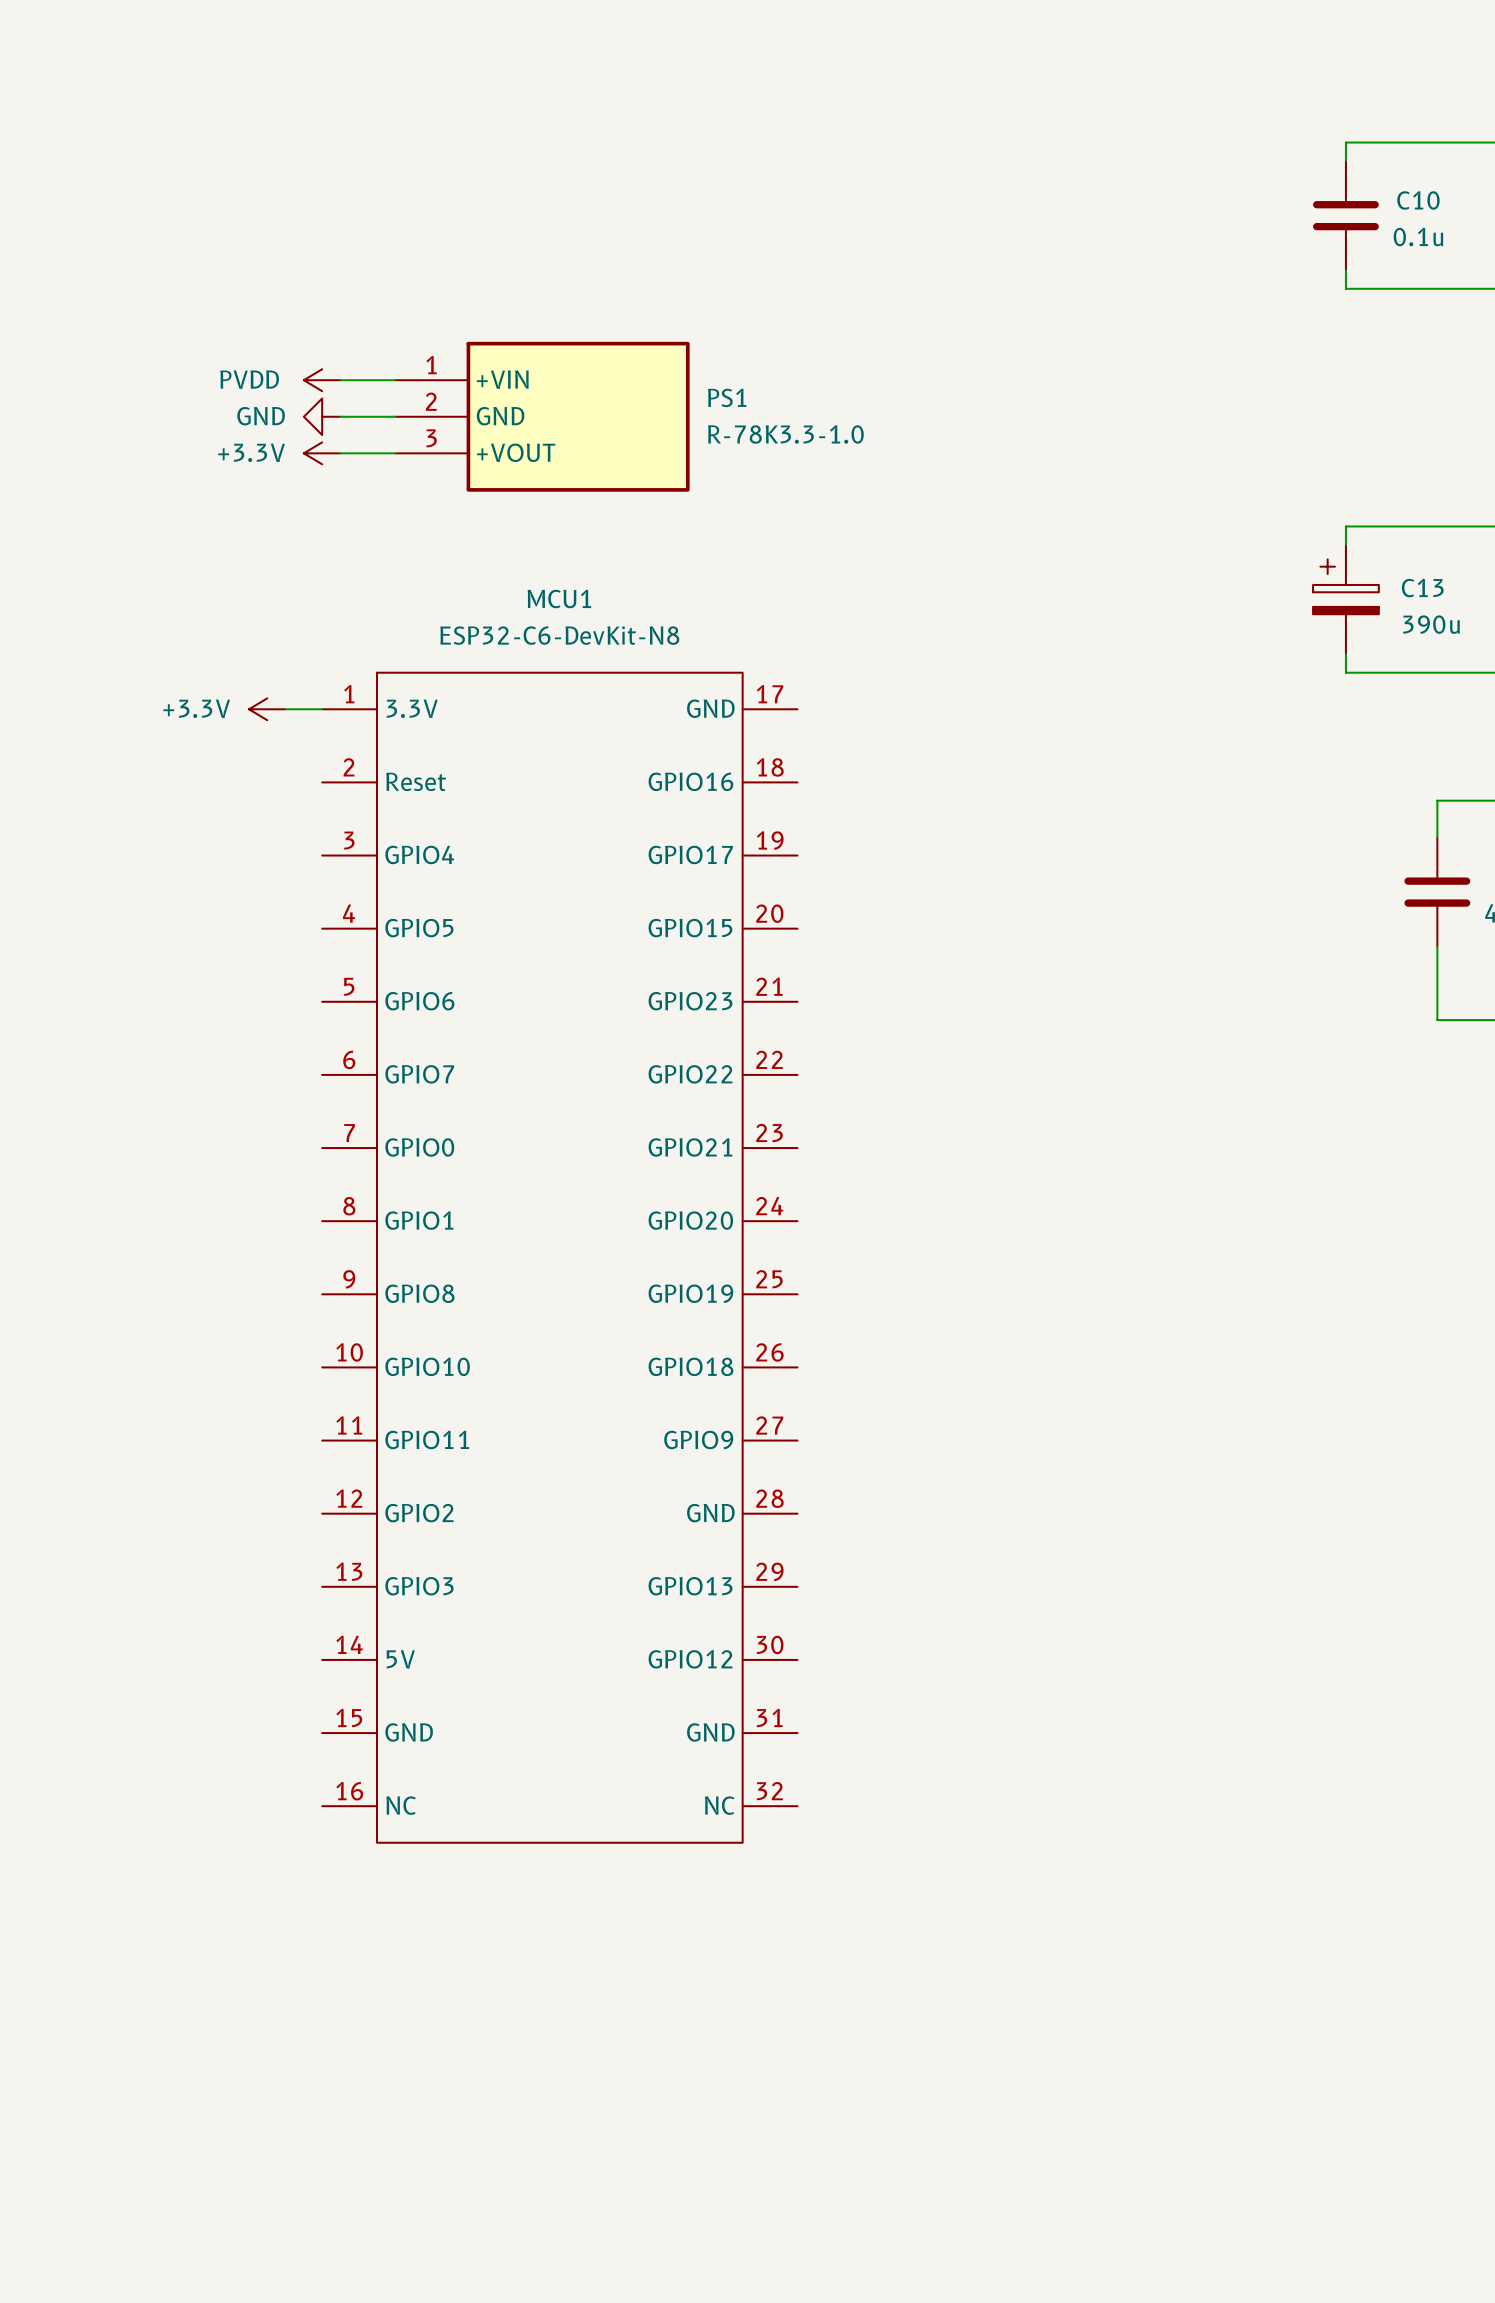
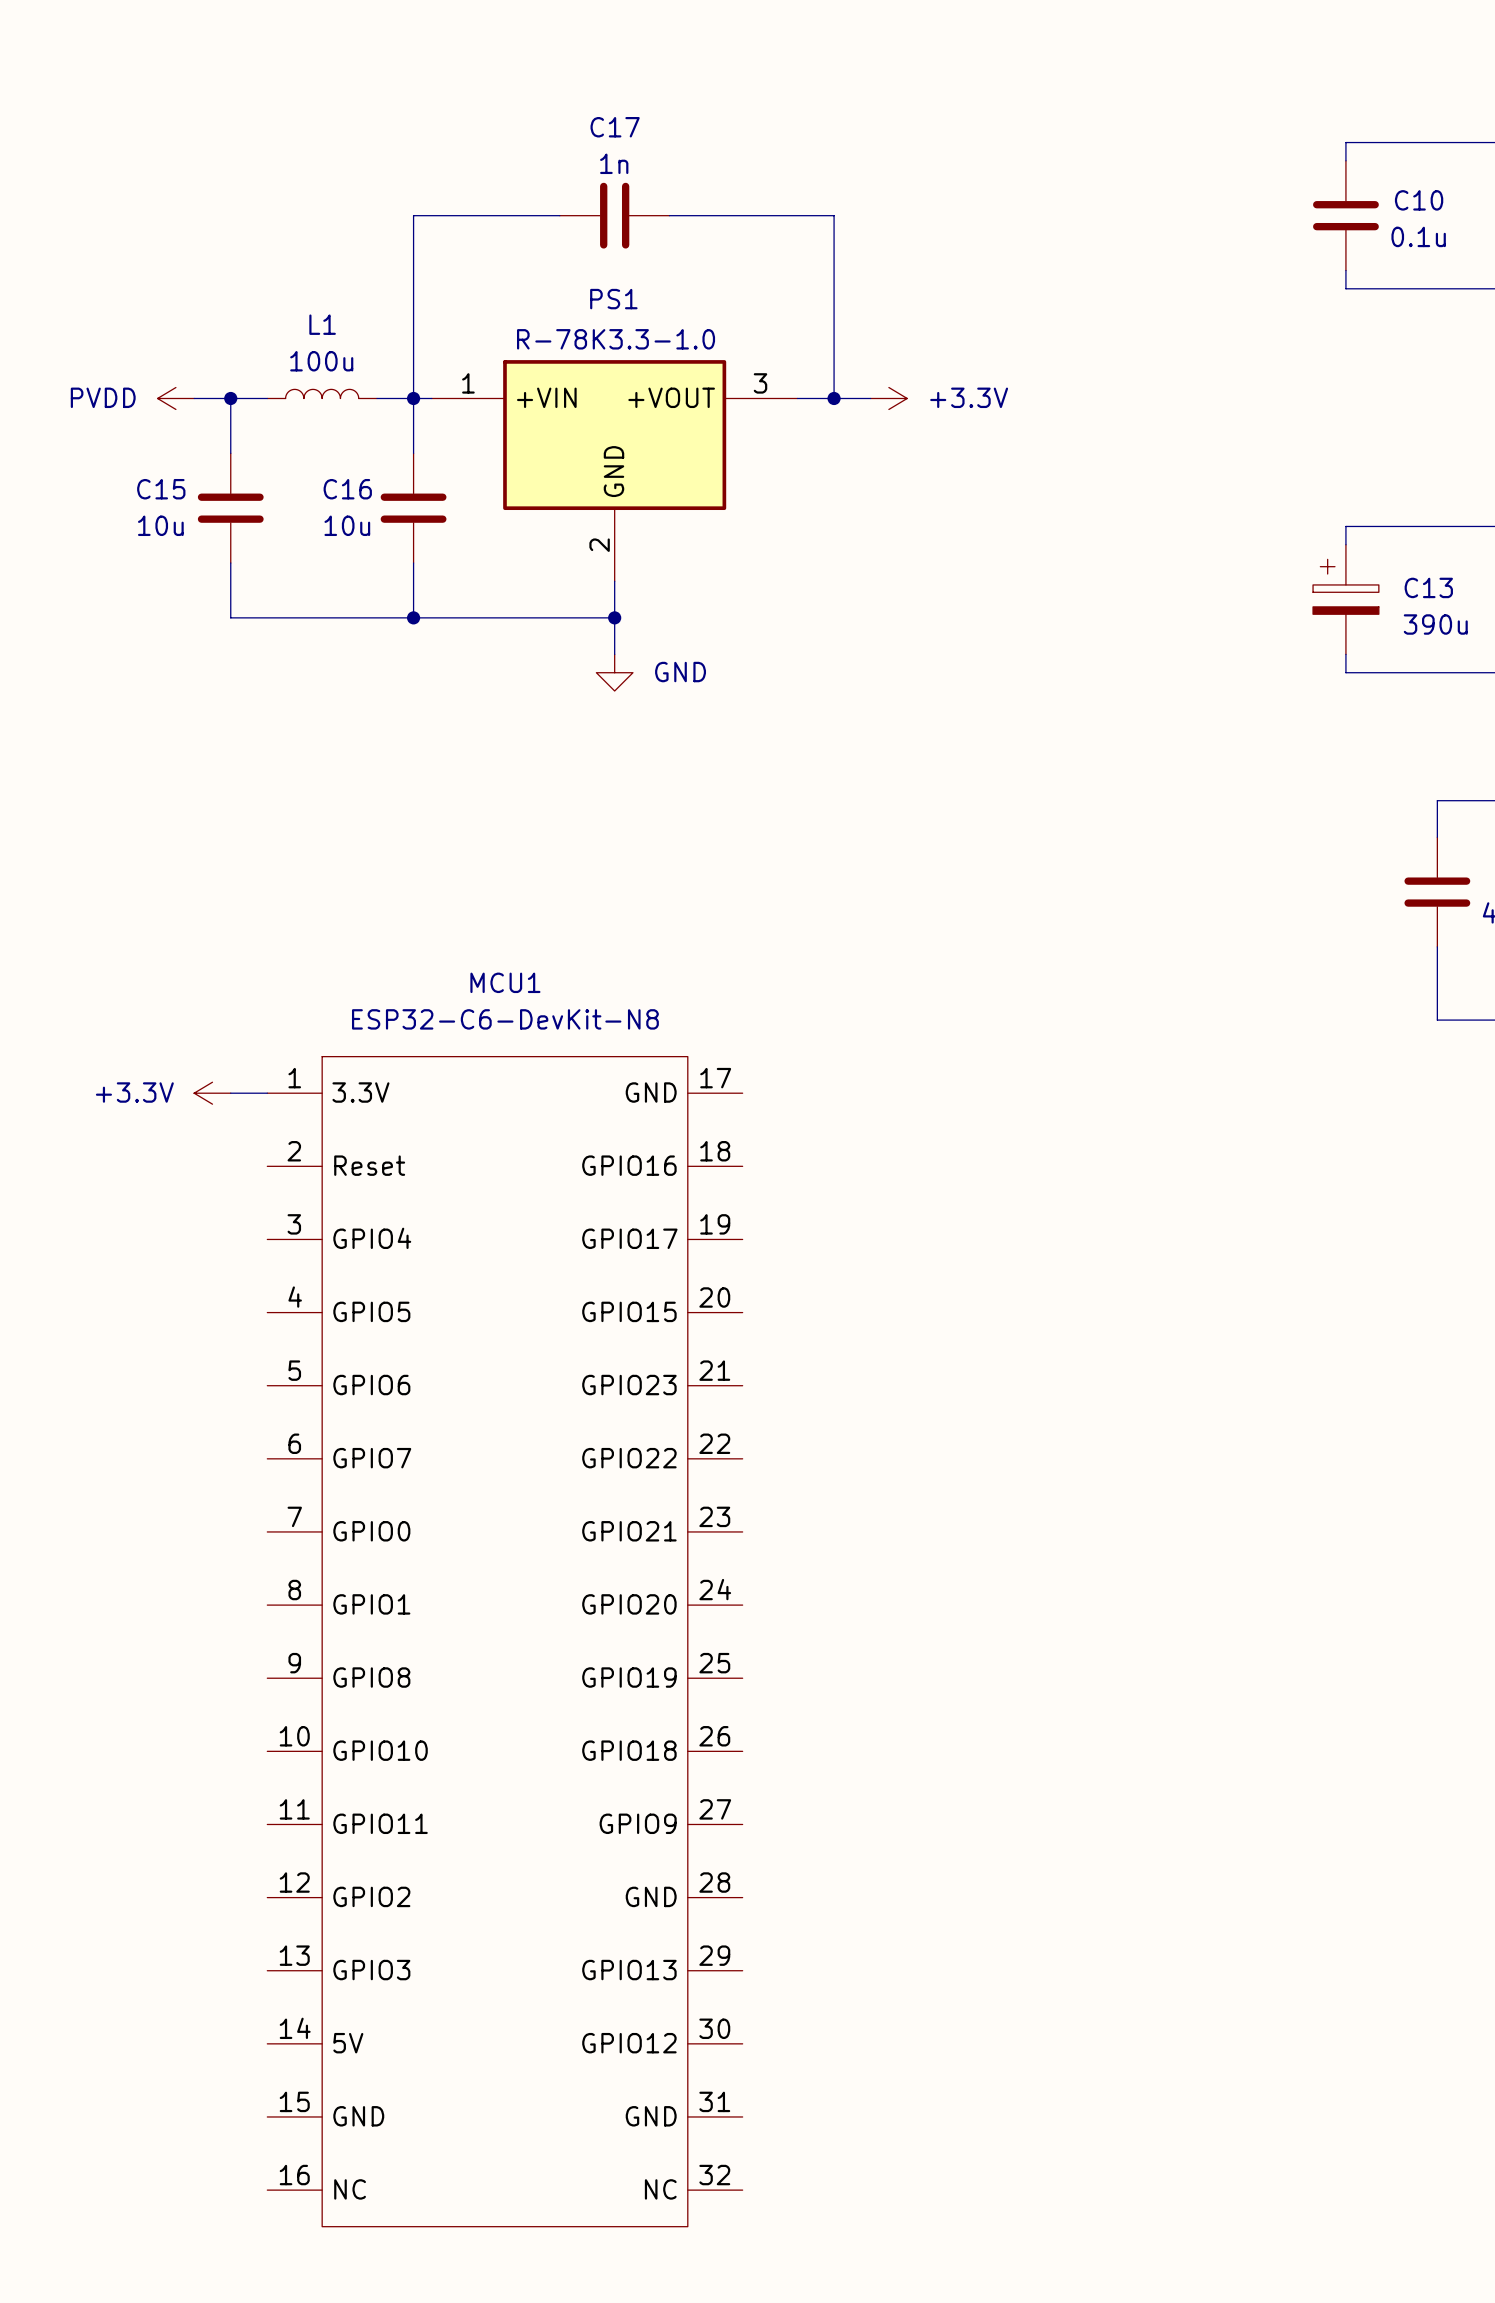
wire: none -> (559, 215) (413, 215) (413, 453)
C17: none -> 1n (614, 215)
wire: none -> (669, 215) (834, 215) (834, 398)
PS1 symbol: [395, 341, 690, 492] -> [431, 360, 798, 582]
power symbol position: PVDD (322, 380) -> PVDD (175, 398)
wire: (340, 380) (395, 380) -> (377, 398) (431, 398)
L1: none -> 100u (322, 393)
PS1 name position: PS1 (727, 397) -> PS1 (613, 299)
wire: none -> (194, 398) (267, 398)
wire: none -> (230, 398) (230, 453)
junction: none -> (230, 398)
junction: none -> (413, 398)
wire: none -> (797, 398) (870, 398)
junction: none -> (834, 398)
power symbol: none -> +3.3V (888, 398)
power symbol: GND (322, 416) -> none
wire: (340, 416) (395, 416) -> none
PS1 value position: R-78K3.3-1.0 (785, 434) -> R-78K3.3-1.0 (616, 339)
power symbol: +3.3V (322, 453) -> none
wire: (340, 453) (395, 453) -> none
C15: none -> 10u (230, 508)
C16: none -> 10u (413, 508)
wire: none -> (230, 563) (230, 617) (614, 617)
wire: none -> (413, 563) (413, 617)
wire: none -> (614, 581) (614, 654)
junction: none -> (413, 617)
junction: none -> (614, 617)
power symbol: none -> GND (614, 672)
power symbol: +3.3V (267, 709) -> none
wire: (285, 709) (322, 709) -> none
power symbol: none -> +3.3V (212, 1093)
wire: none -> (230, 1093) (267, 1093)
MCU1 position: (559, 1257) -> (504, 1641)

